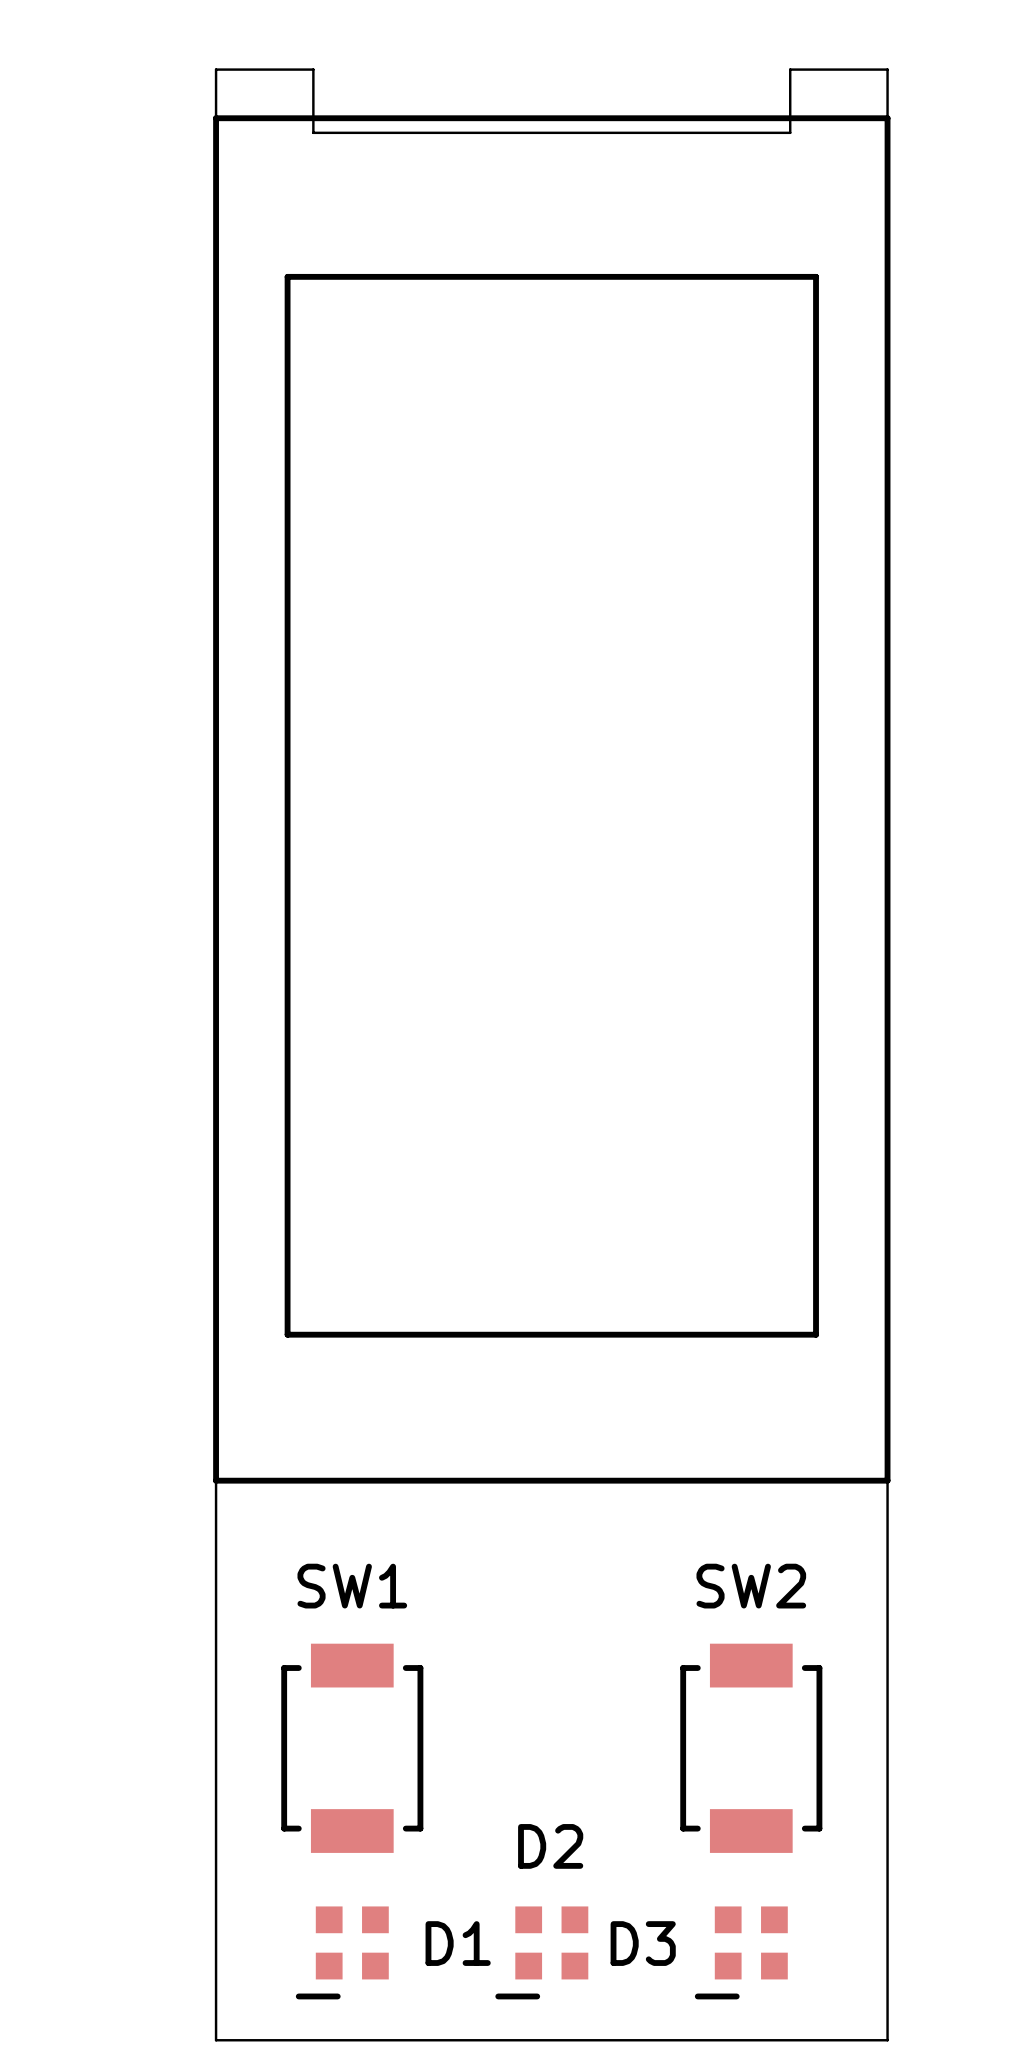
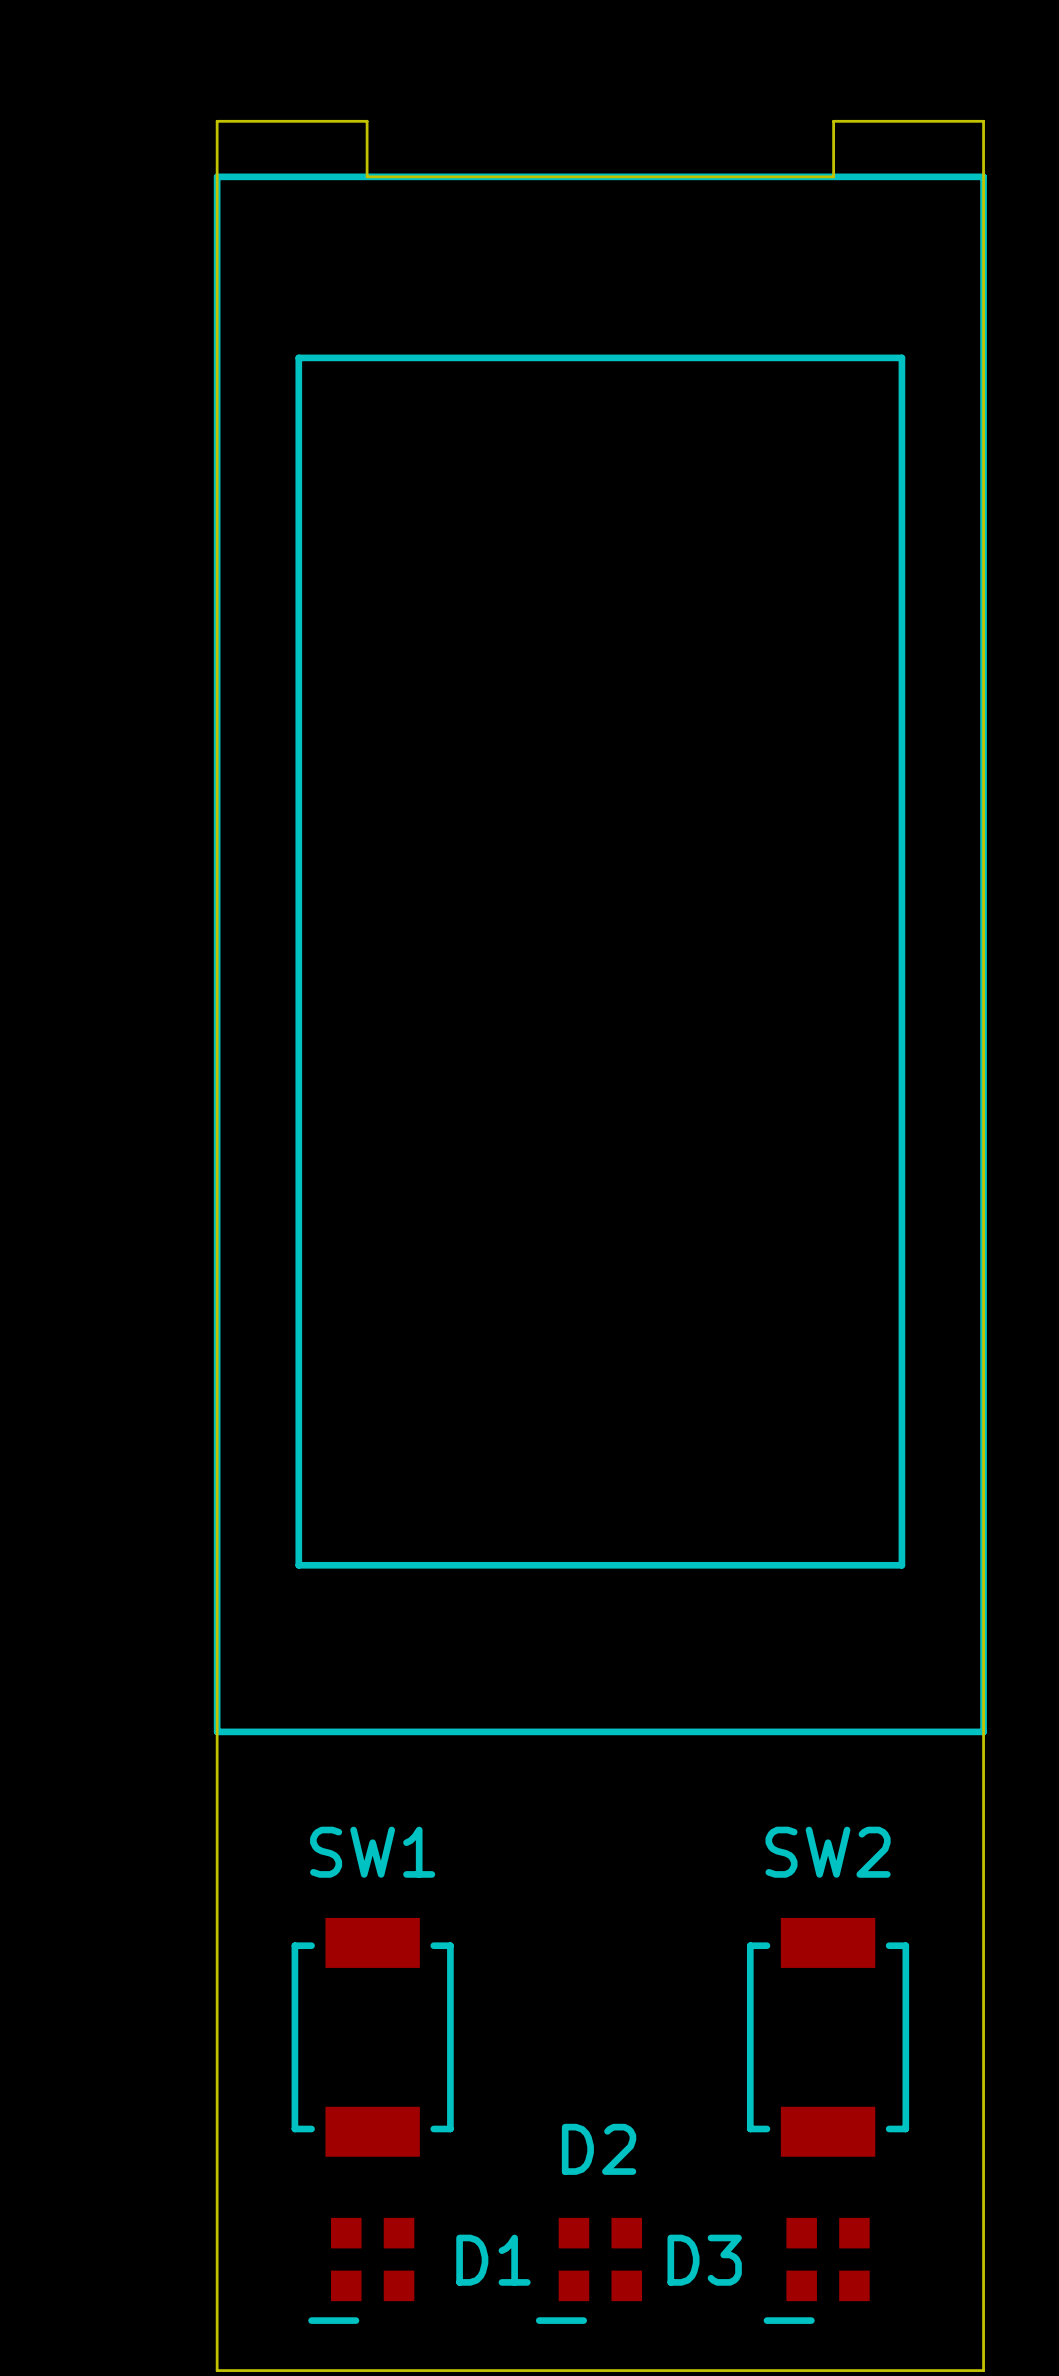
board edge: (313, 69) (313, 132) (790, 132) (790, 69) -> (328, 121) (367, 121) (367, 176) (833, 176) (833, 121) (872, 121)

